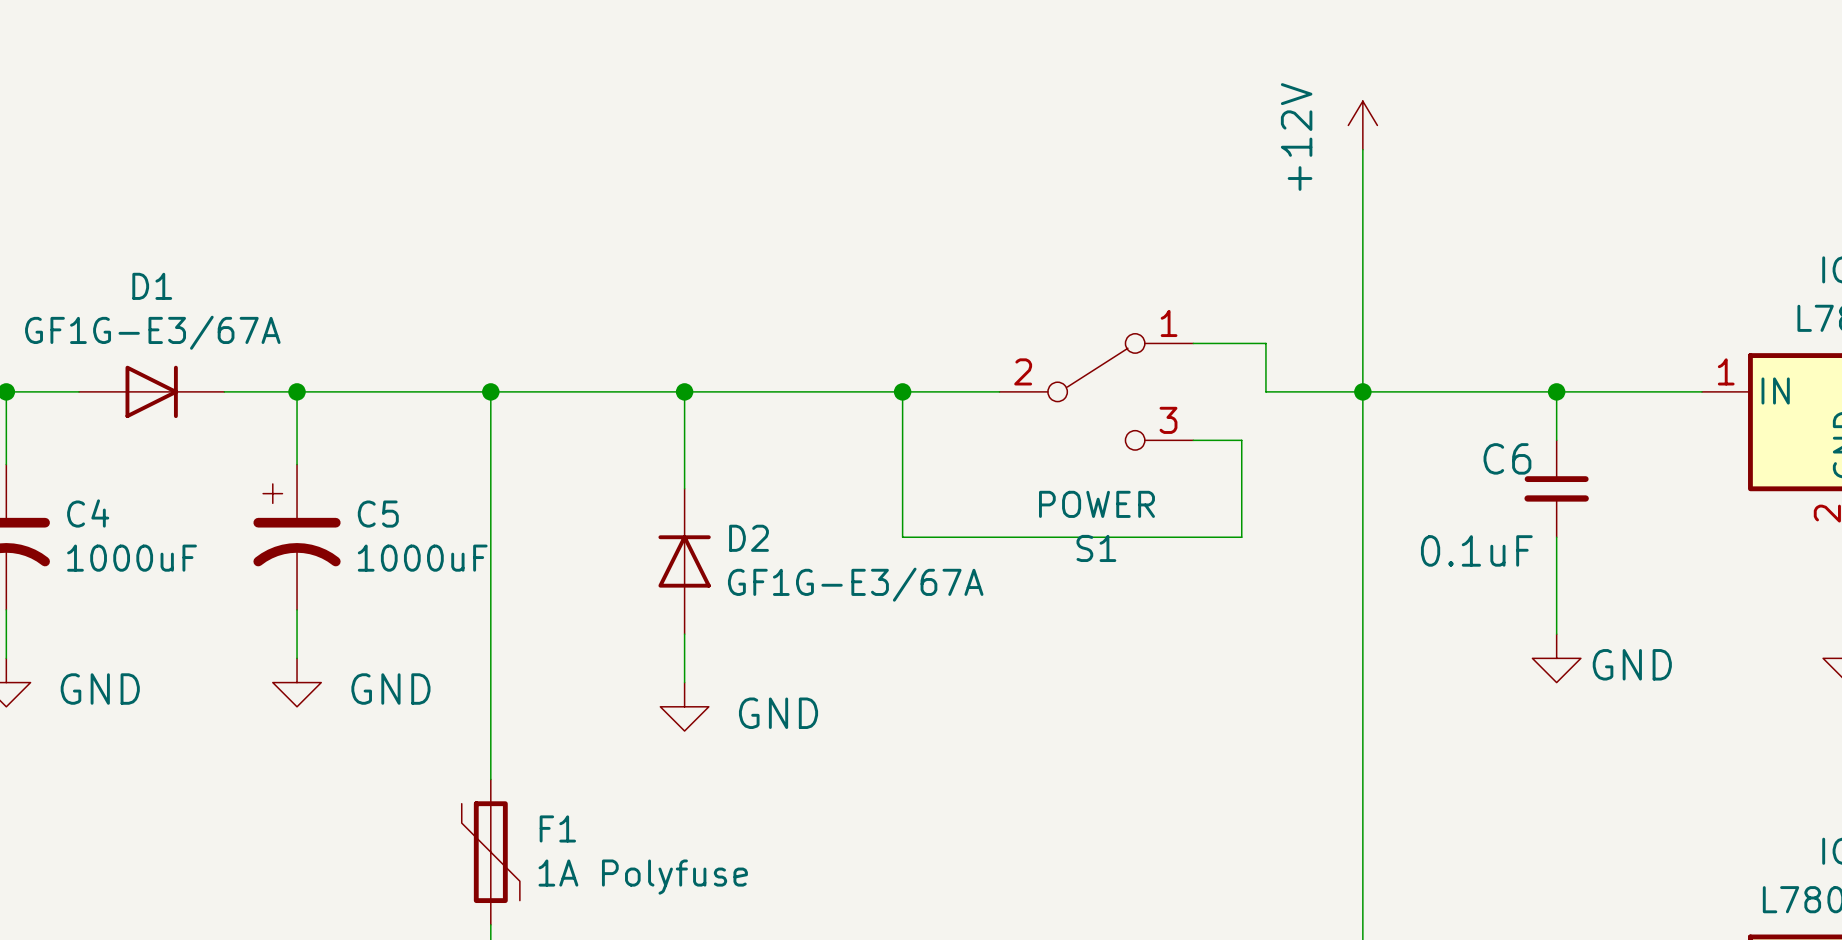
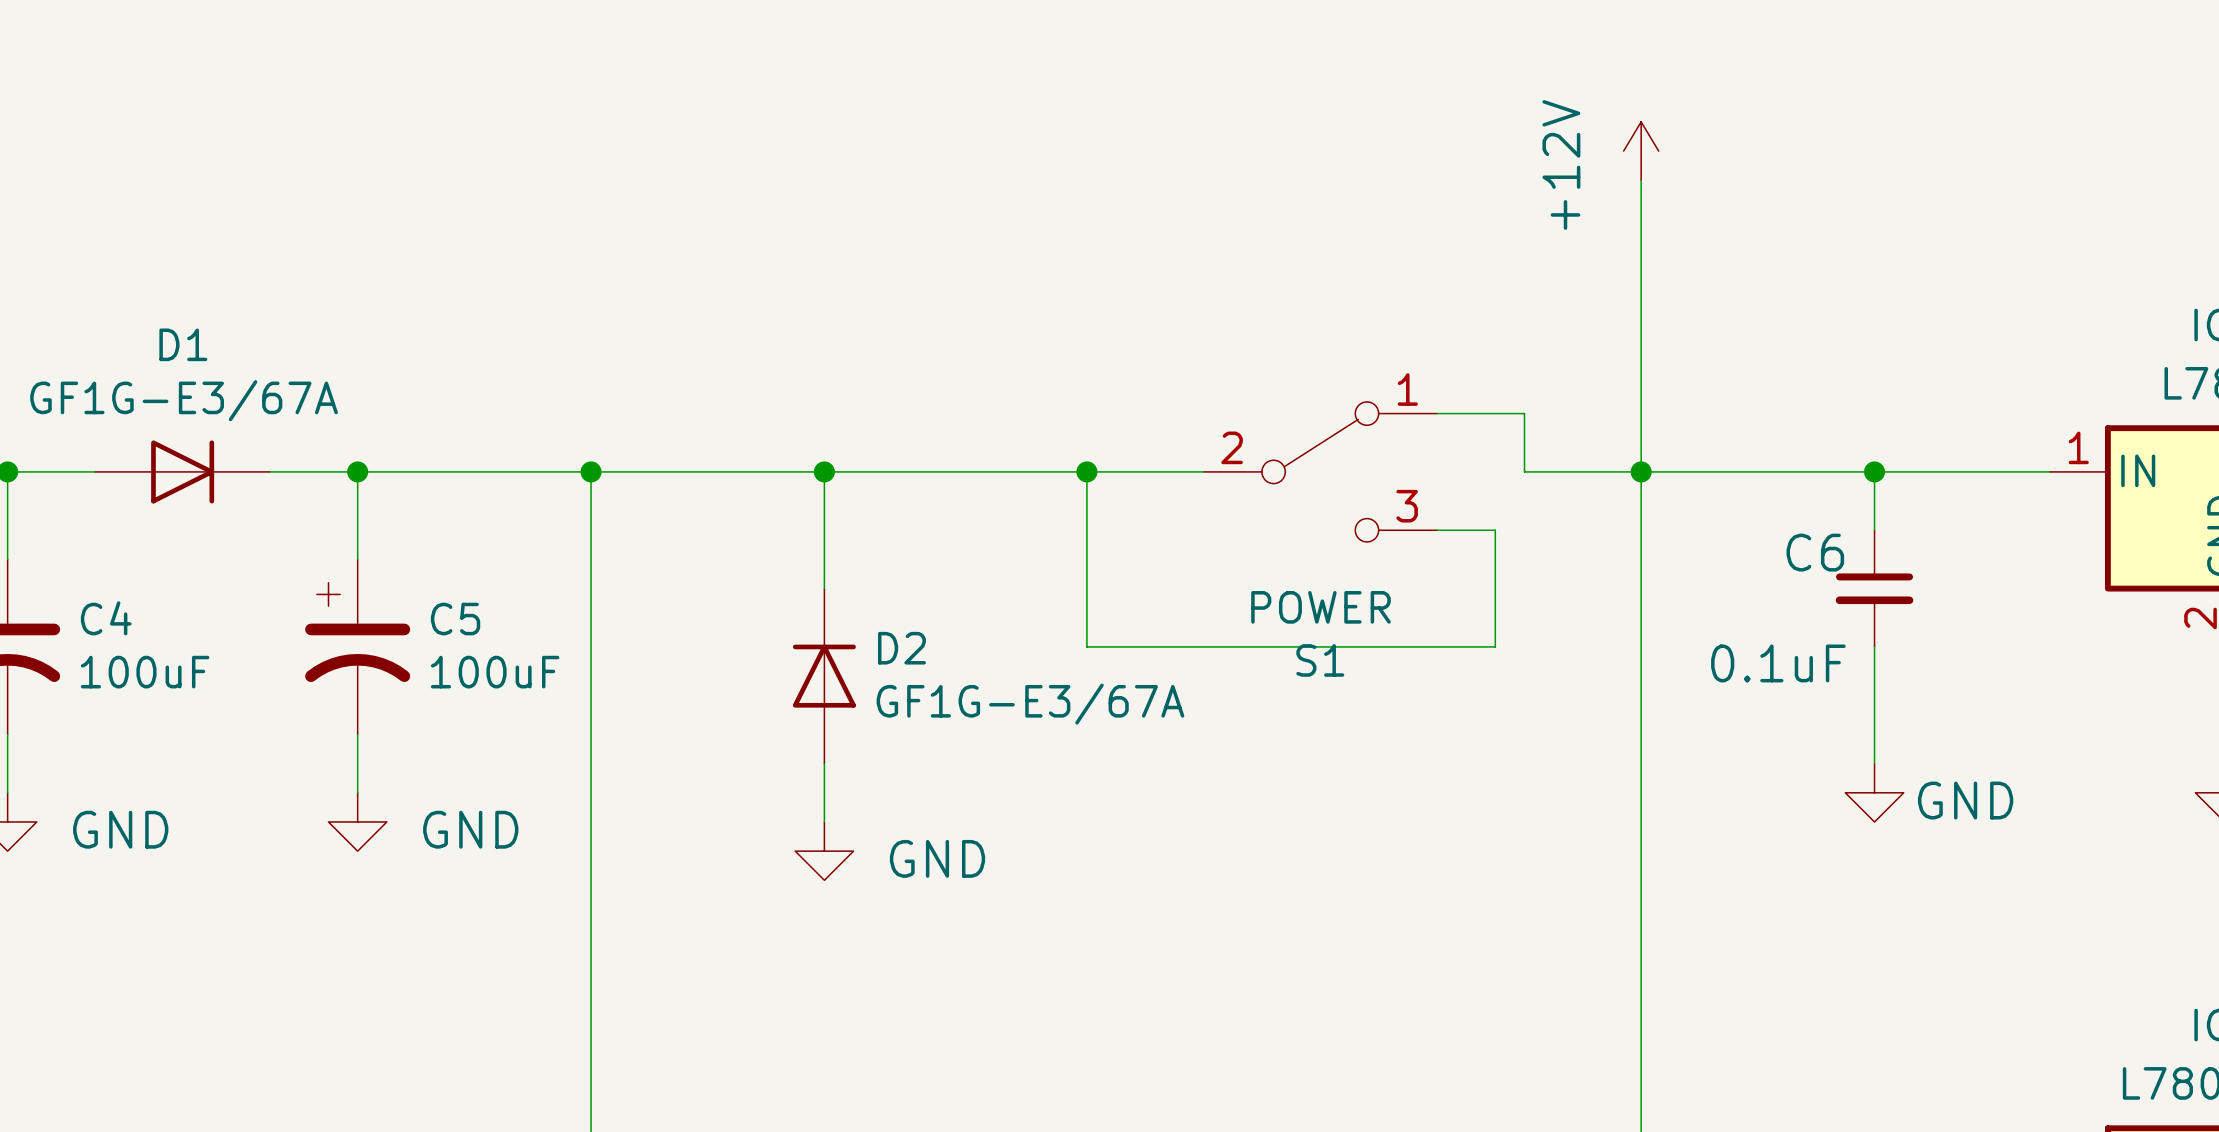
C4 value: 1000uF (132, 558) -> 100uF (145, 672)
C5 value: 1000uF (422, 558) -> 100uF (495, 672)
F1: 1A Polyfuse (490, 852) -> none

